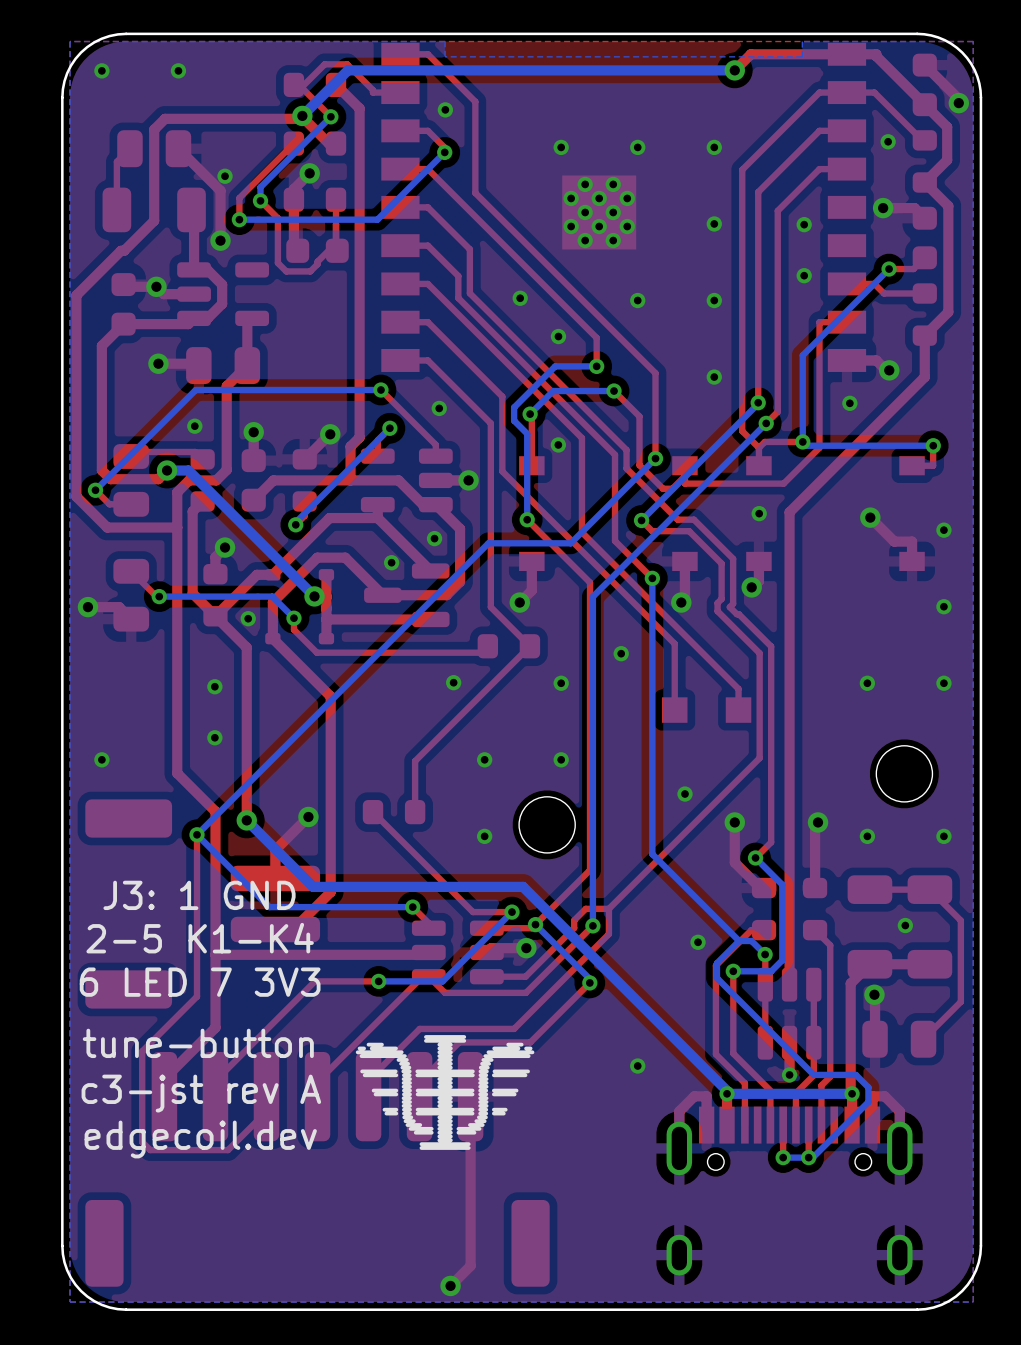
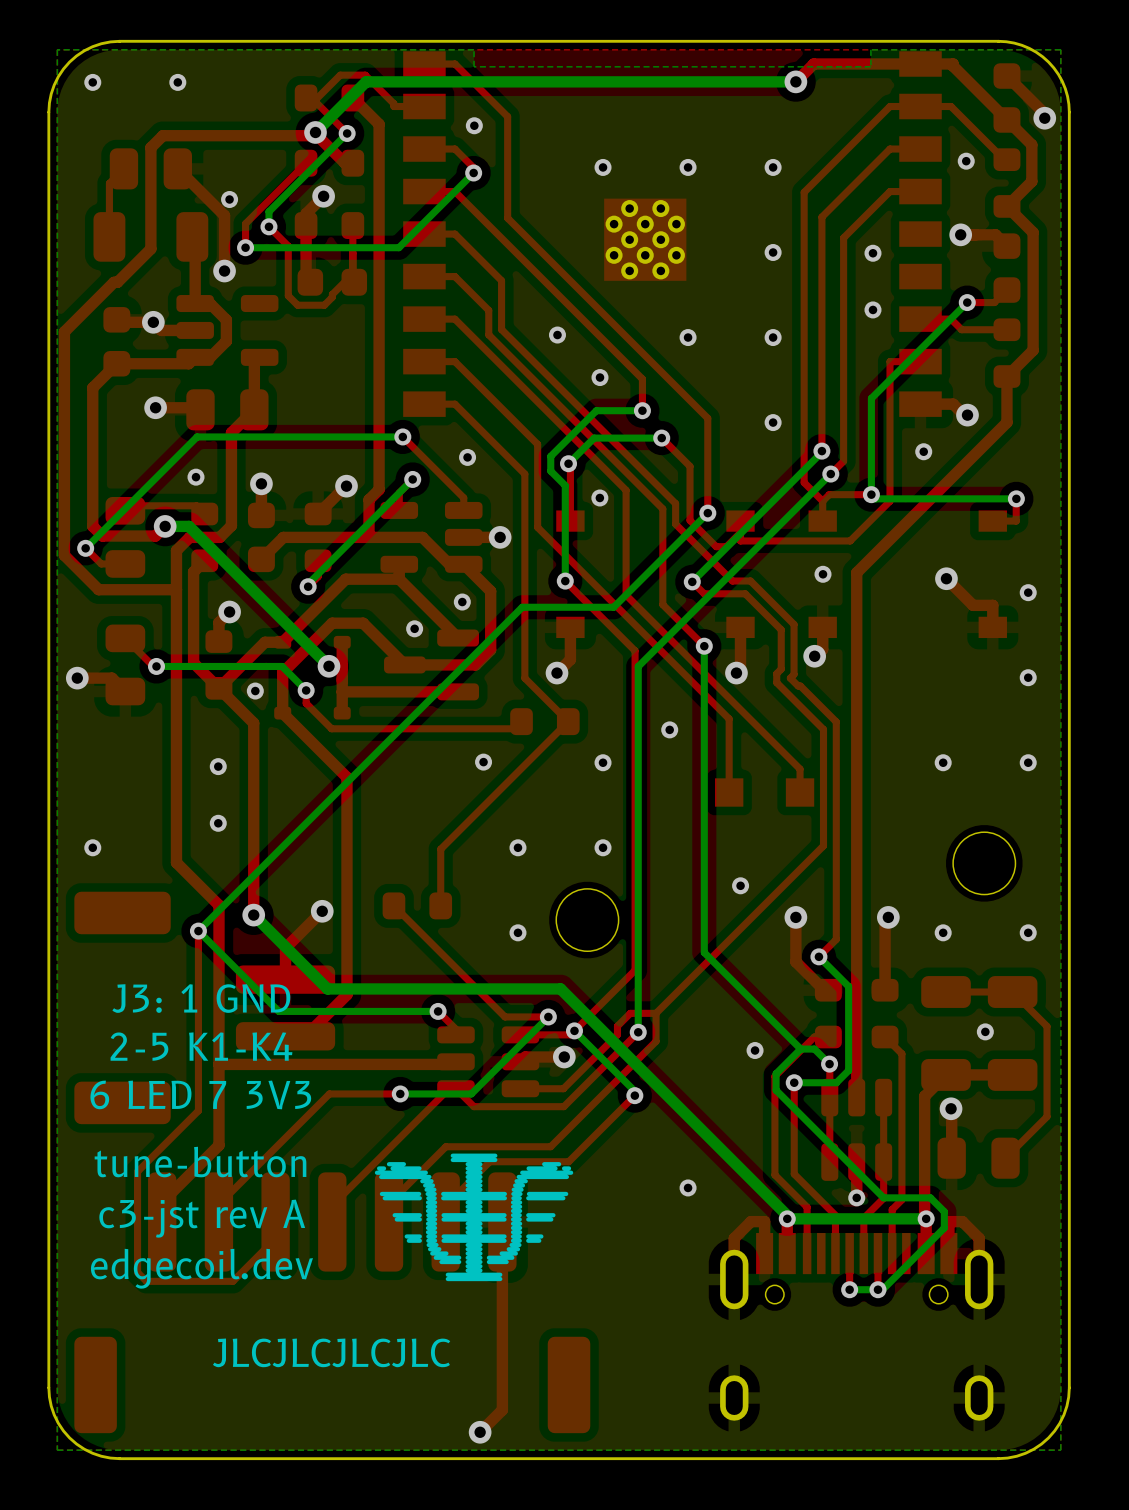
text: none -> JLCJLCJLCJLC (331, 1352)

